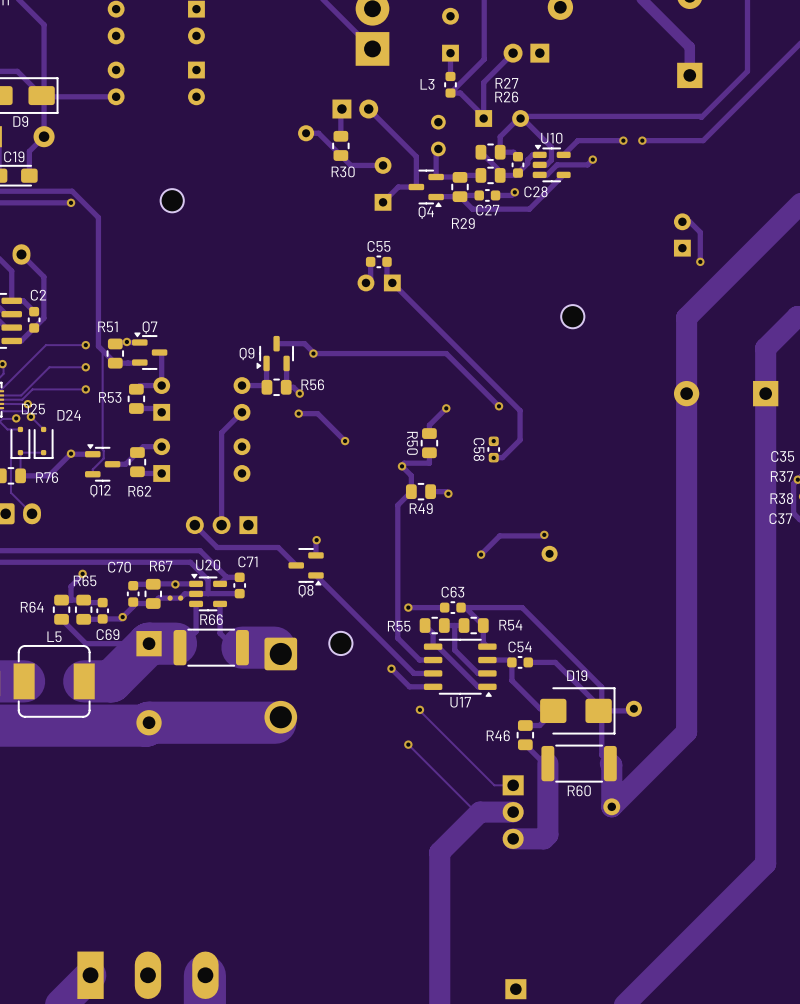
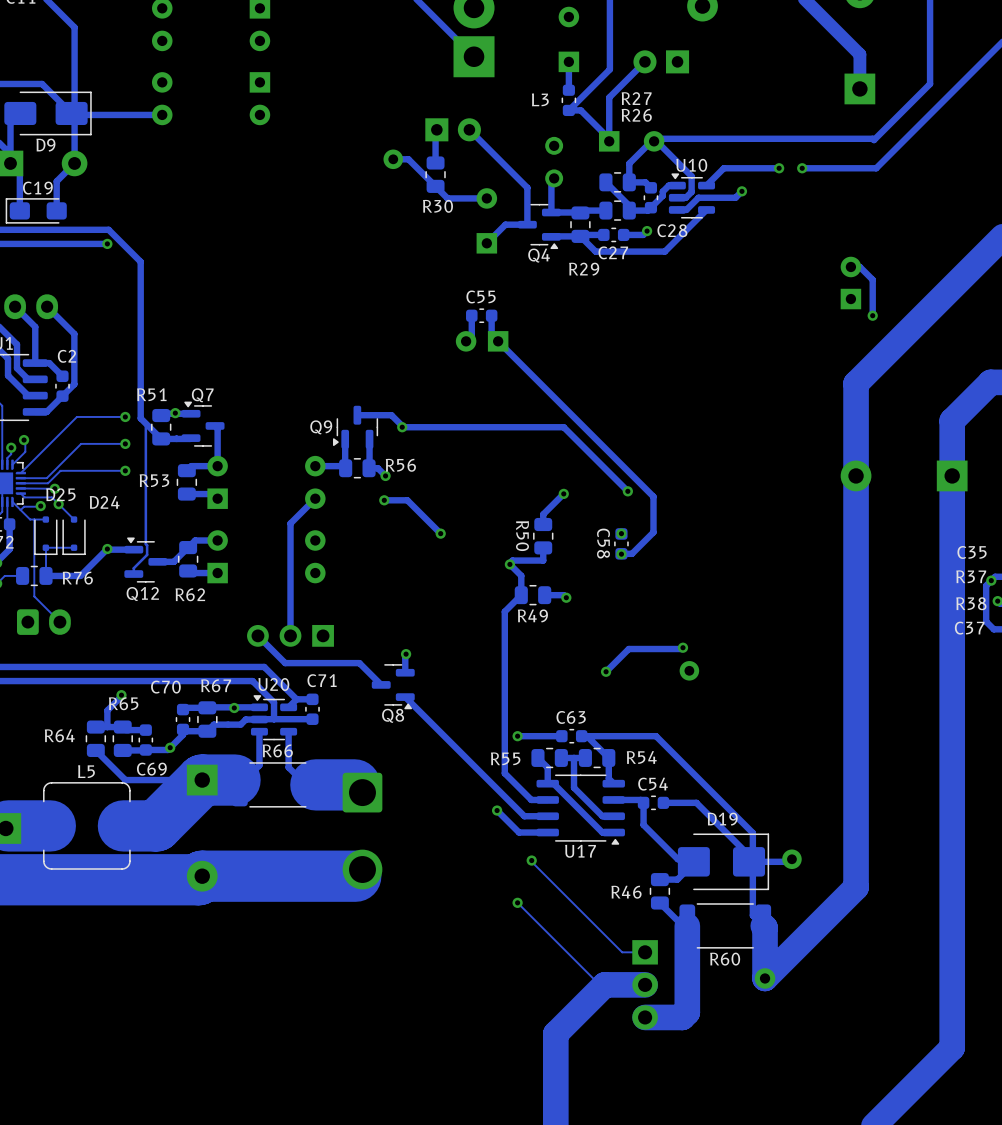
part: (172, 200) -> none
part: (572, 316) -> none
part: (340, 643) -> none

